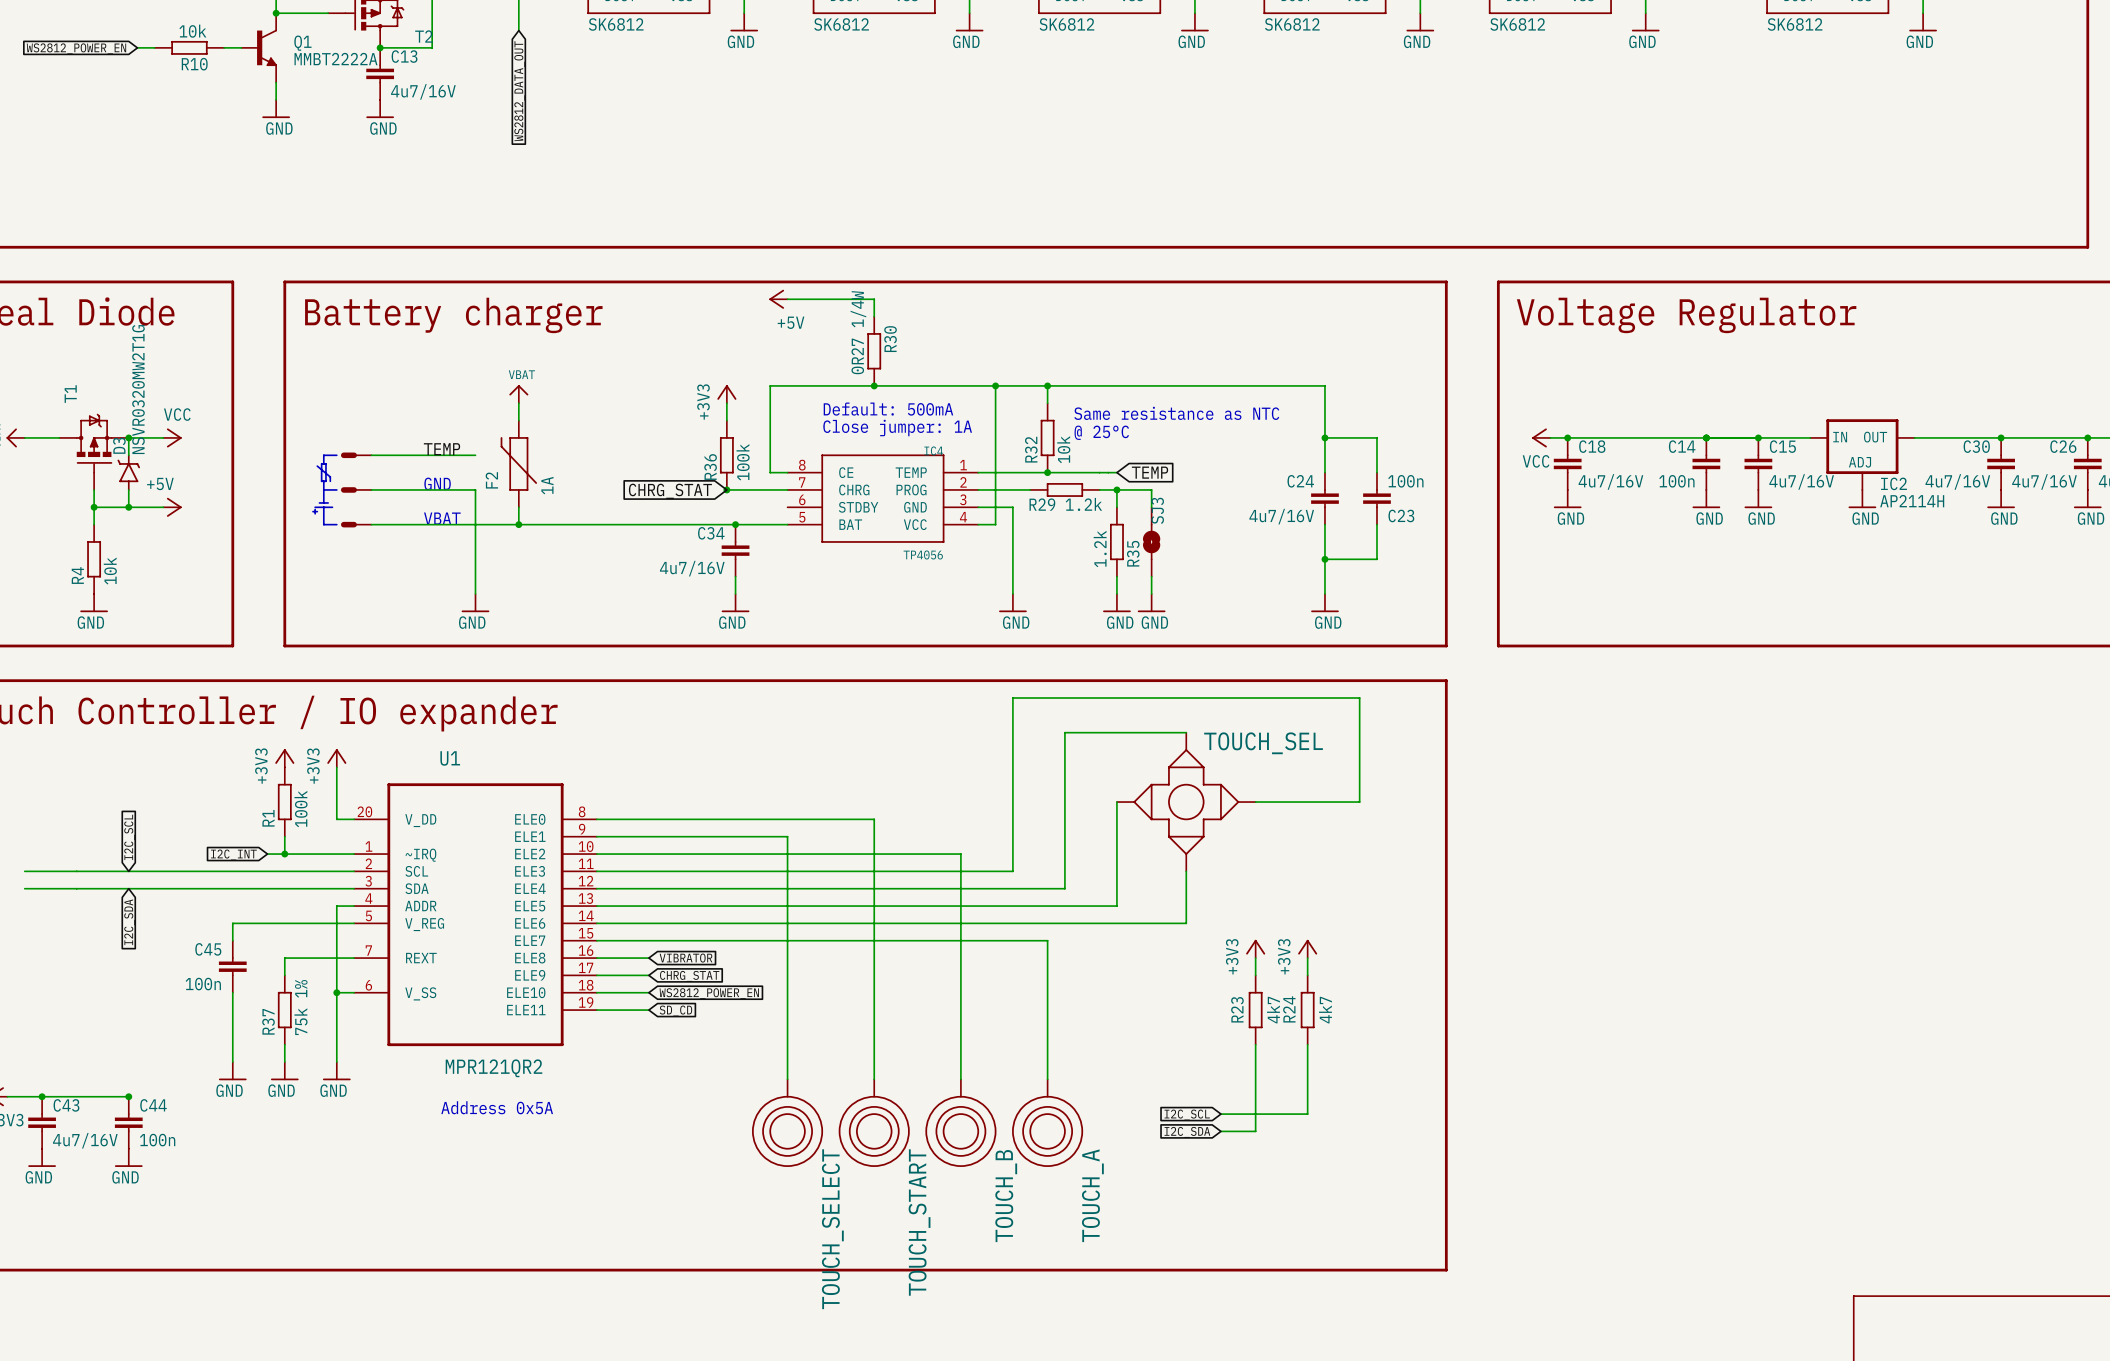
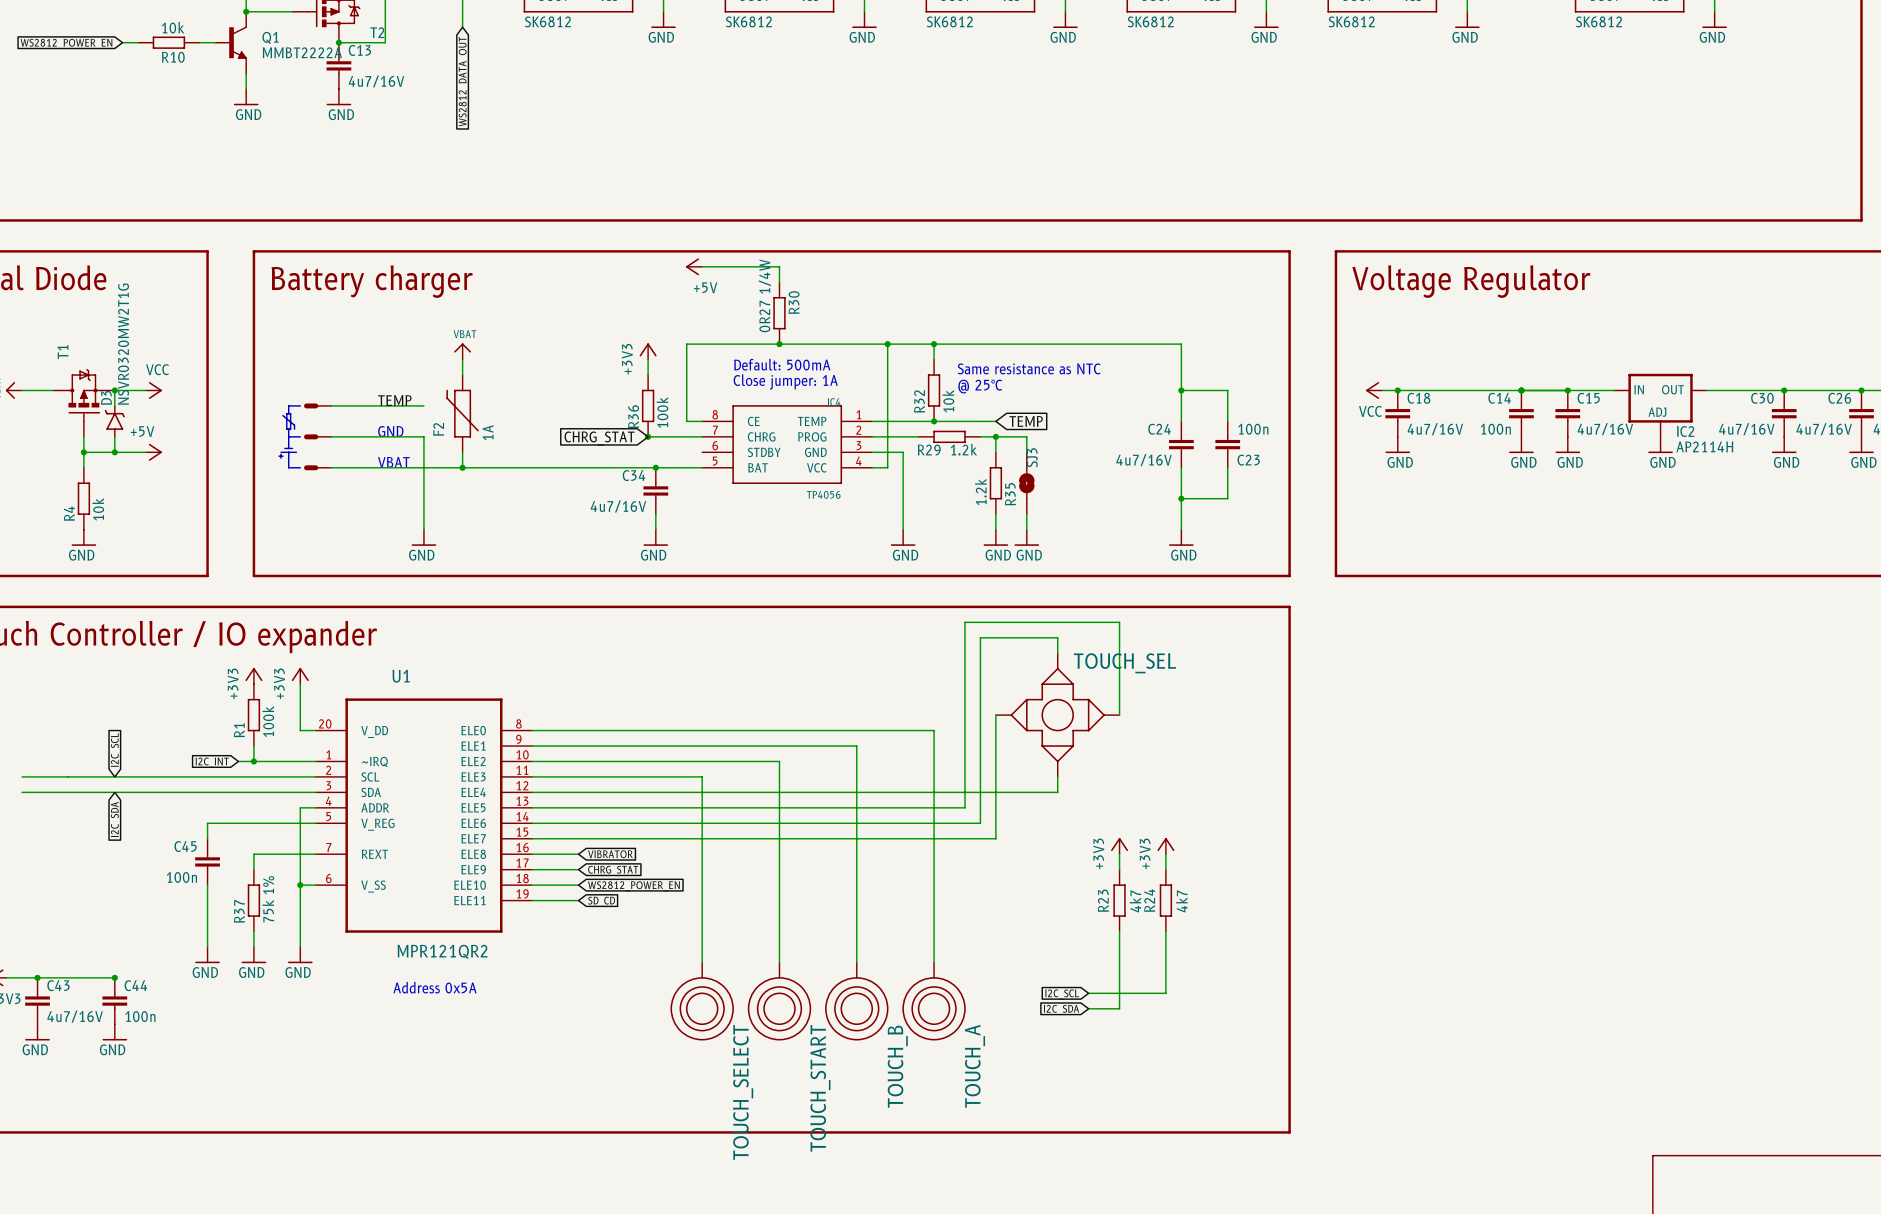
wire: (1082, 698) (1012, 698) (1012, 871) (787, 871) (787, 836) -> none
wire: (1255, 698) (1359, 698) (1359, 802) (1255, 802) -> (1119, 622) (1119, 715)
wire: (1186, 732) (1064, 732) (1064, 888) -> (1057, 653) (1057, 637) (980, 637) (980, 823)
wire: (874, 819) (874, 854) (960, 854) -> (702, 746) (856, 746) (856, 761)
wire: none -> (779, 730) (934, 730) (934, 838) (995, 838) (995, 807)
wire: (1186, 888) (1186, 923) (1099, 923) -> (1057, 792) (949, 792)
wire: (1082, 906) (1116, 906) -> (964, 807) (964, 622)

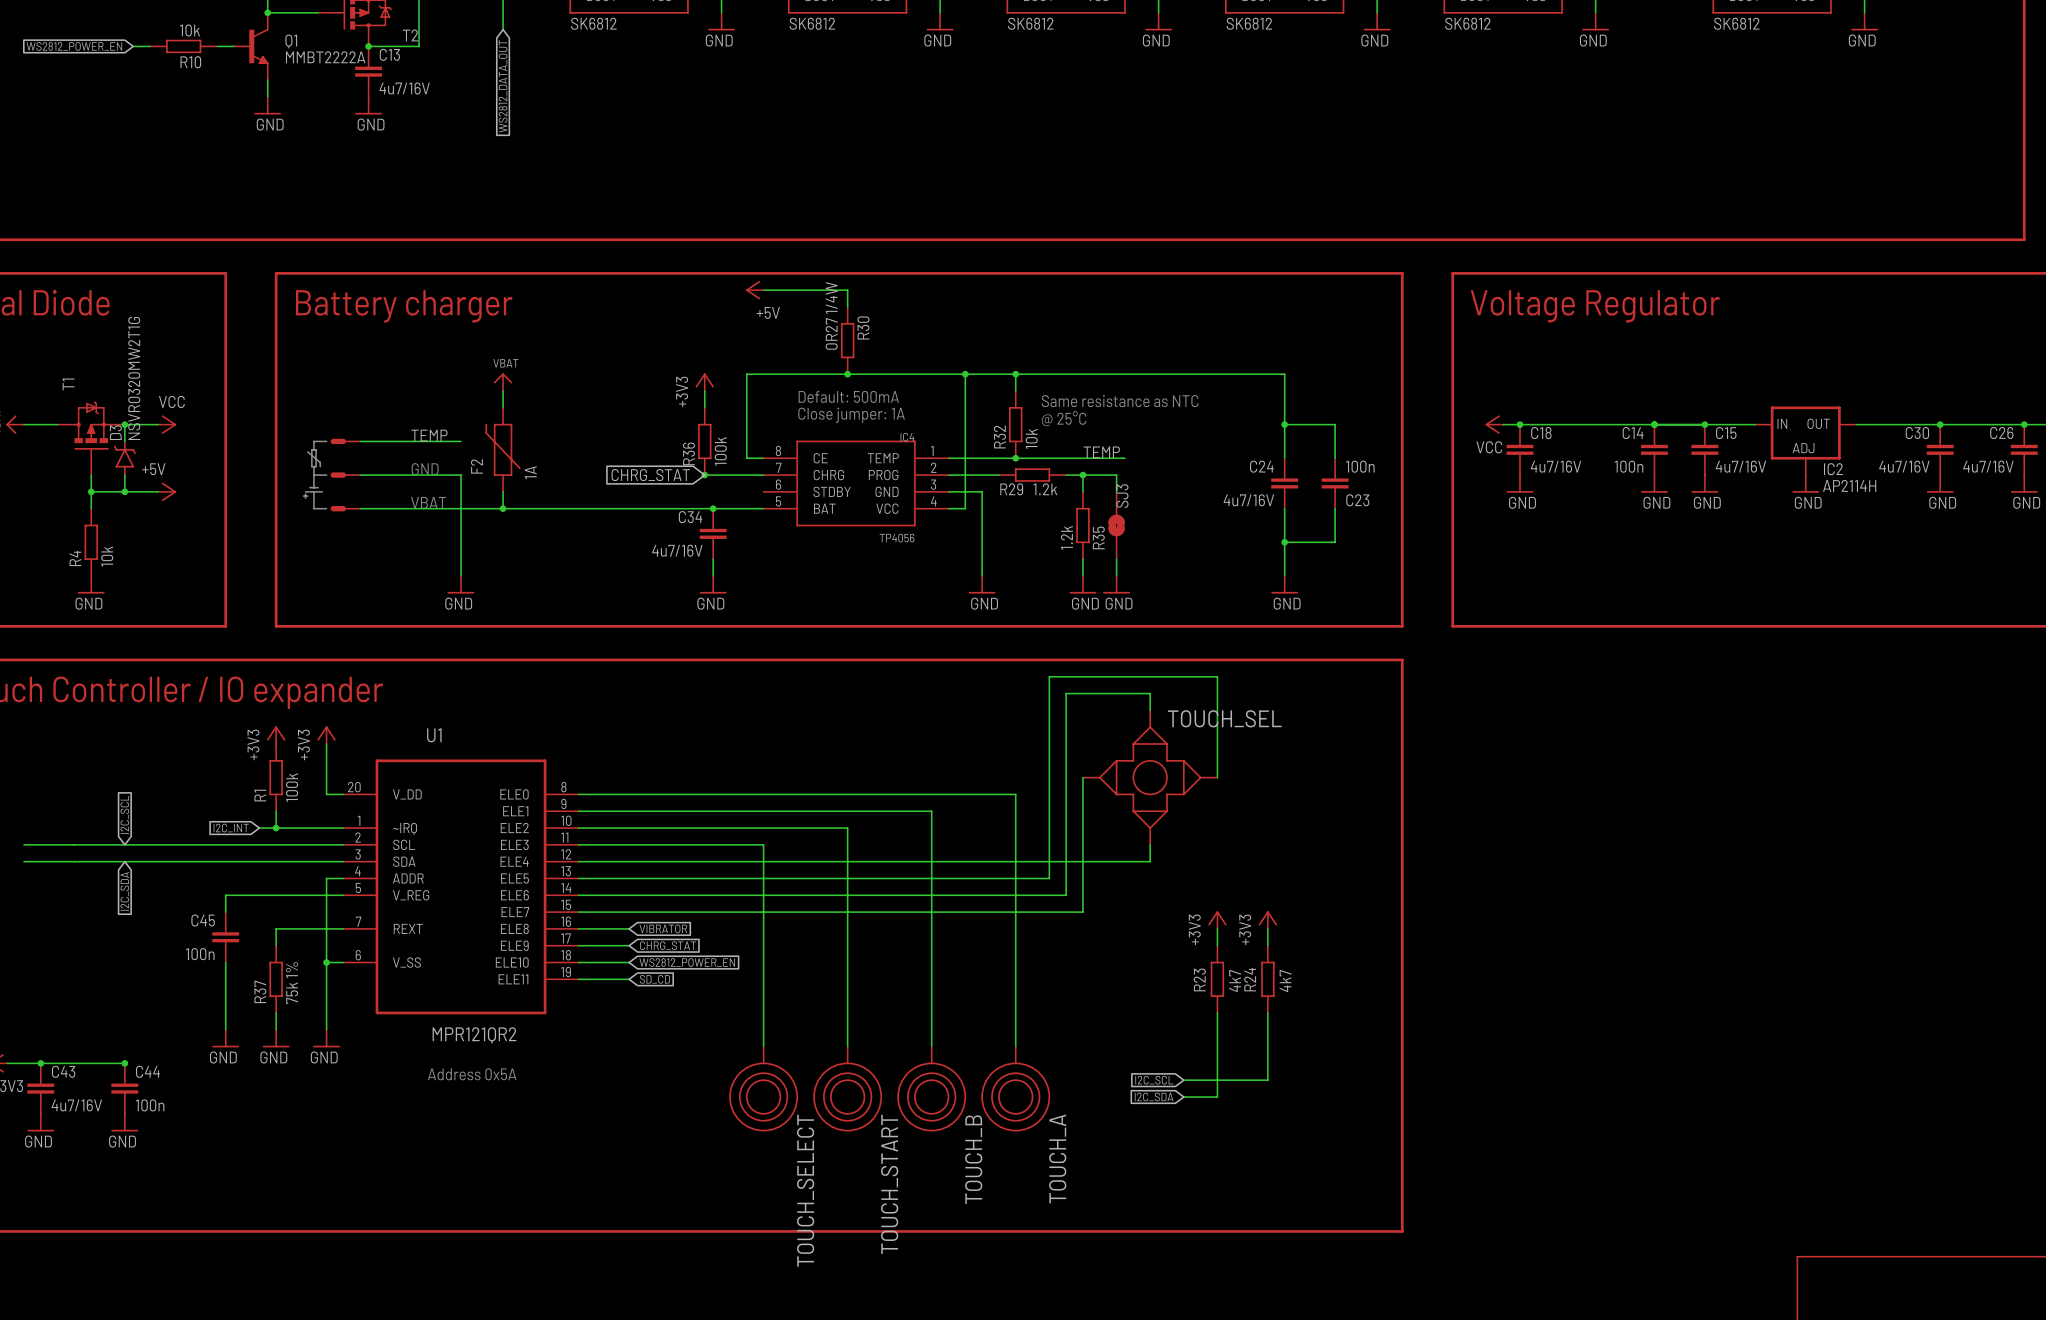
label: none -> TEMP (1101, 452)
wire: none -> (1082, 458) (1124, 458)
global label: TEMP (1026, 421) -> none

